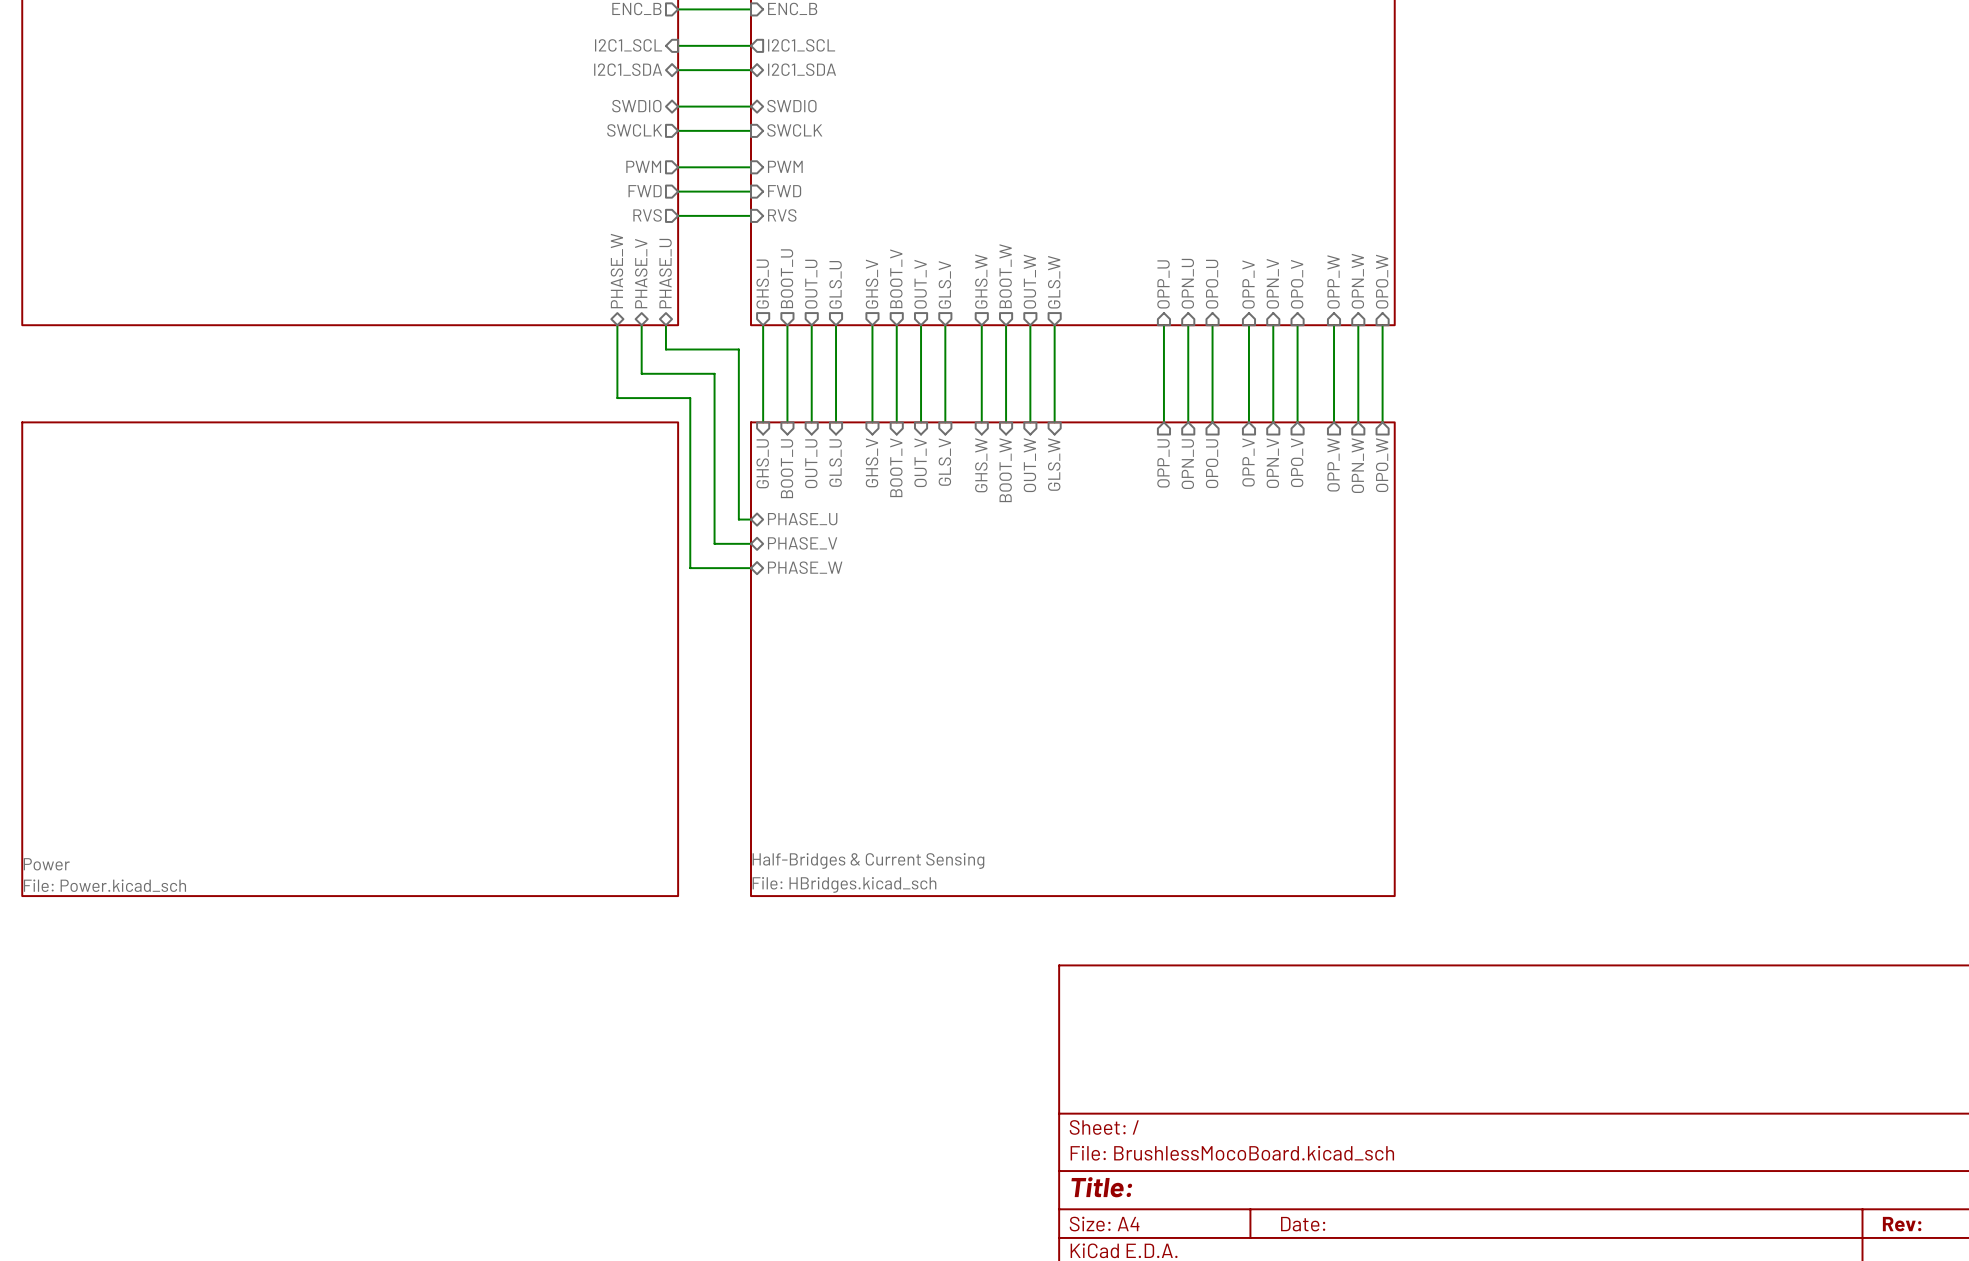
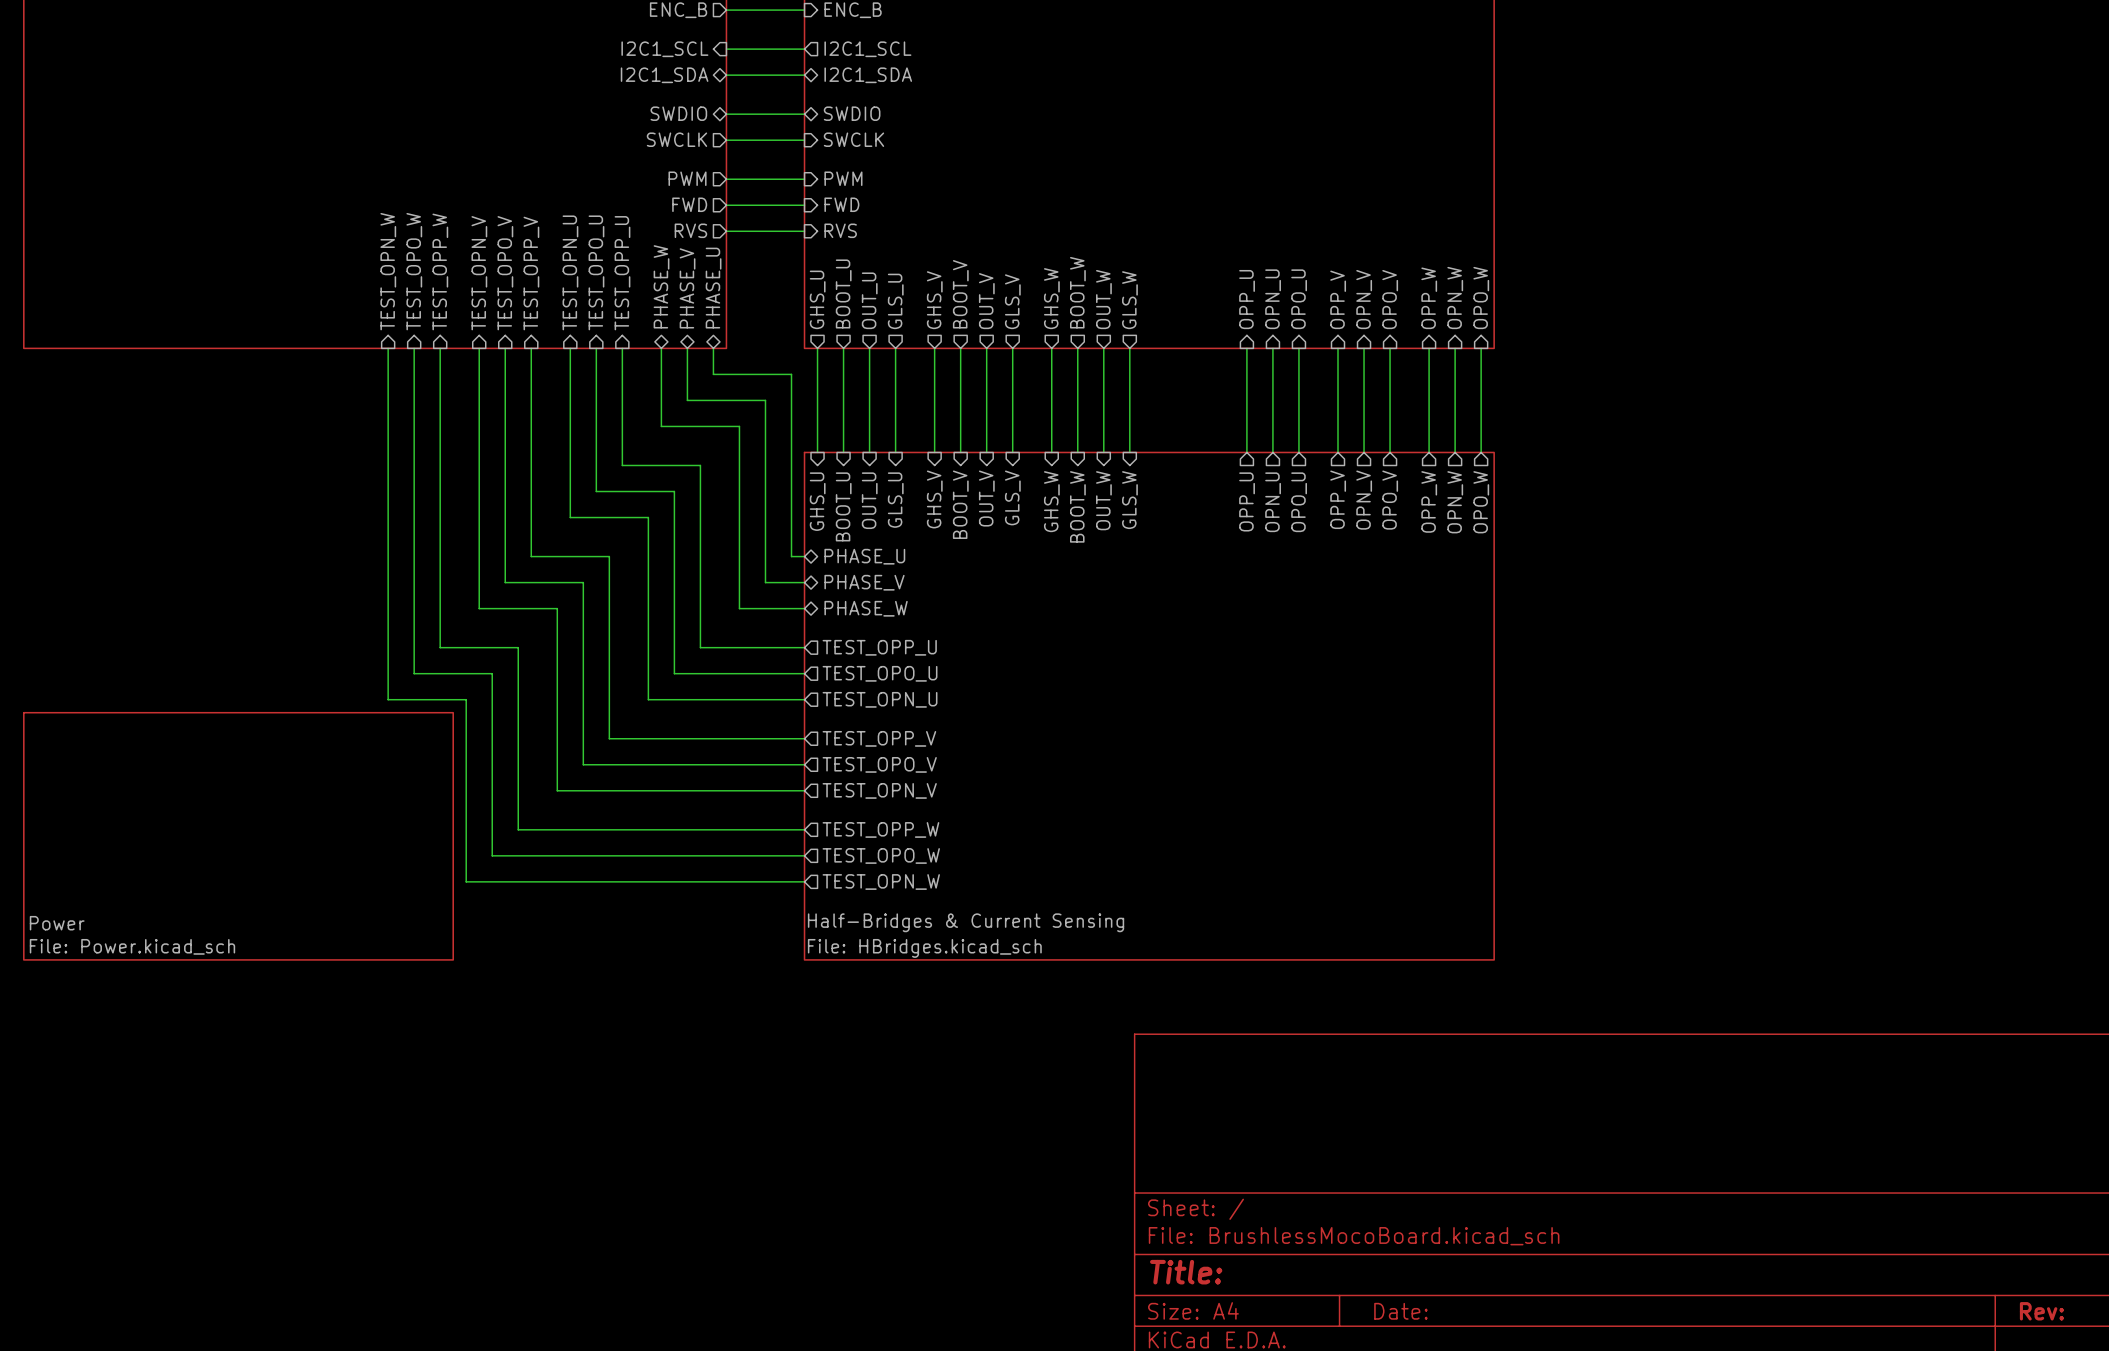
sheet pin: none -> TEST_OPN_W (388, 271)
sheet pin: none -> TEST_OPO_W (414, 271)
sheet pin: none -> TEST_OPP_W (440, 271)
sheet pin: none -> TEST_OPN_V (479, 273)
sheet pin: none -> TEST_OPN_U (570, 272)
sheet pin: none -> TEST_OPO_V (505, 273)
sheet pin: none -> TEST_OPP_V (531, 273)
sheet pin: none -> TEST_OPO_U (596, 272)
sheet pin: none -> TEST_OPP_U (622, 273)
wire: none -> (388, 348) (388, 699) (466, 699) (466, 881) (804, 881)
wire: none -> (414, 348) (414, 673) (492, 673) (492, 855) (804, 855)
wire: none -> (440, 348) (440, 647) (518, 647) (518, 829) (804, 829)
wire: none -> (479, 348) (479, 608) (557, 608) (557, 790) (804, 790)
wire: none -> (505, 348) (505, 582) (583, 582) (583, 764) (804, 764)
wire: none -> (531, 348) (531, 556) (609, 556) (609, 738) (804, 738)
wire: none -> (570, 348) (570, 517) (648, 517) (648, 699) (804, 699)
wire: none -> (596, 348) (596, 491) (674, 491) (674, 673) (804, 673)
wire: none -> (622, 348) (622, 465) (700, 465) (700, 647) (804, 647)
sheet pin: none -> TEST_OPP_U (879, 647)
sheet pin: none -> TEST_OPO_U (880, 673)
sheet pin: none -> TEST_OPN_U (880, 699)
sheet Power: File: Power.kicad_sch (350, 659) -> none
sheet pin: none -> TEST_OPP_V (879, 738)
sheet pin: none -> TEST_OPO_V (879, 764)
sheet pin: none -> TEST_OPN_V (879, 790)
sheet pin: none -> TEST_OPP_W (880, 829)
sheet Power: none -> File: Power.kicad_sch (238, 836)
sheet pin: none -> TEST_OPO_W (881, 855)
sheet pin: none -> TEST_OPN_W (881, 882)

